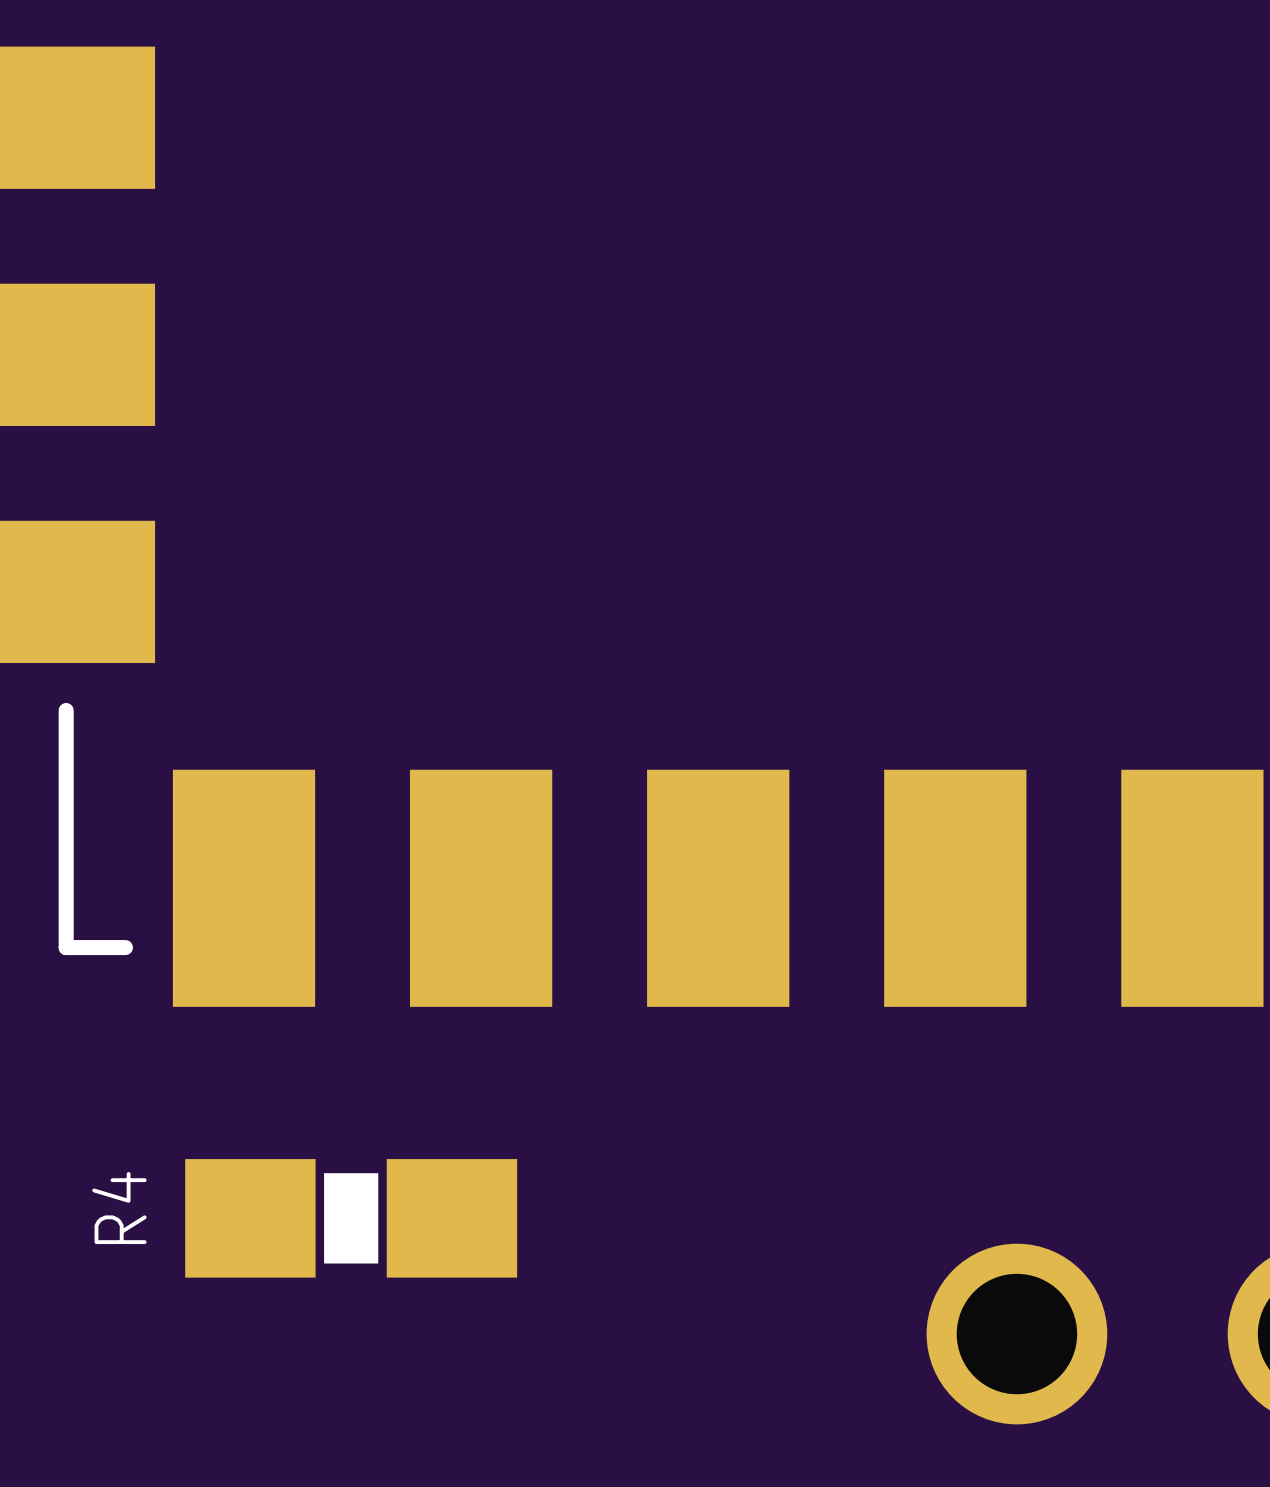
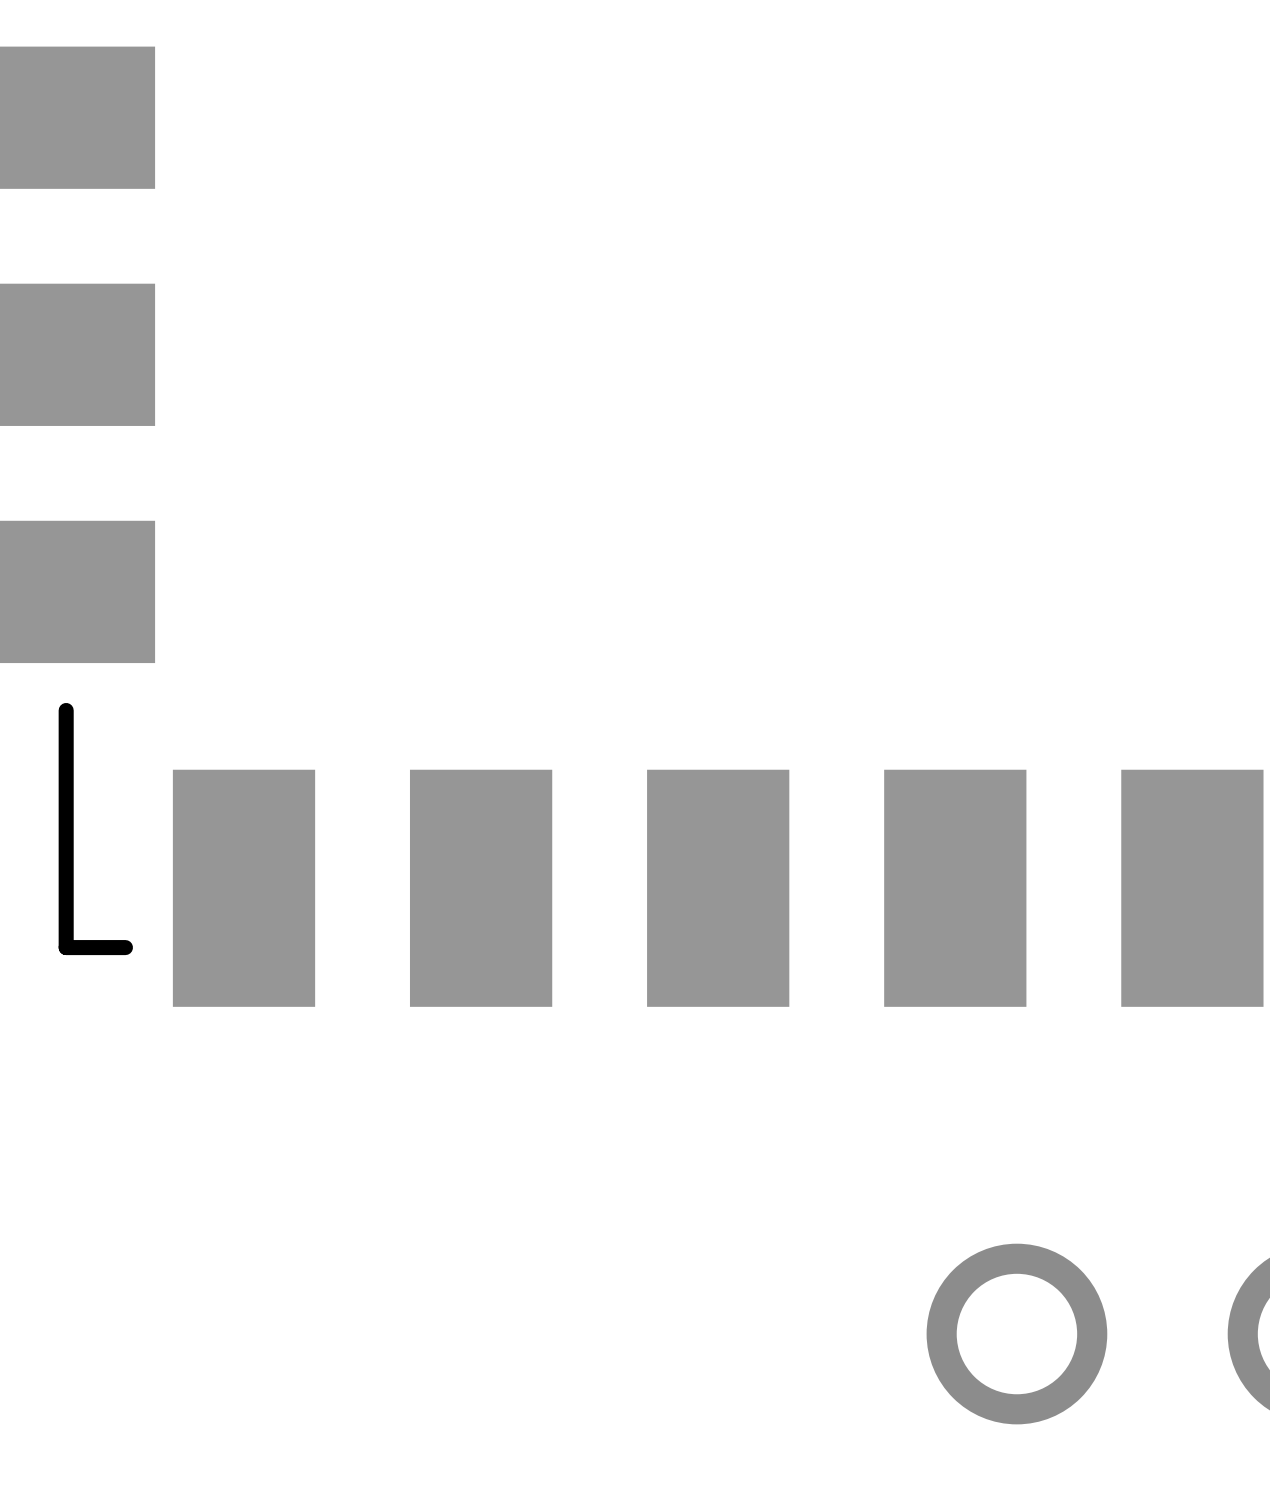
R4: (351, 1218) -> none

